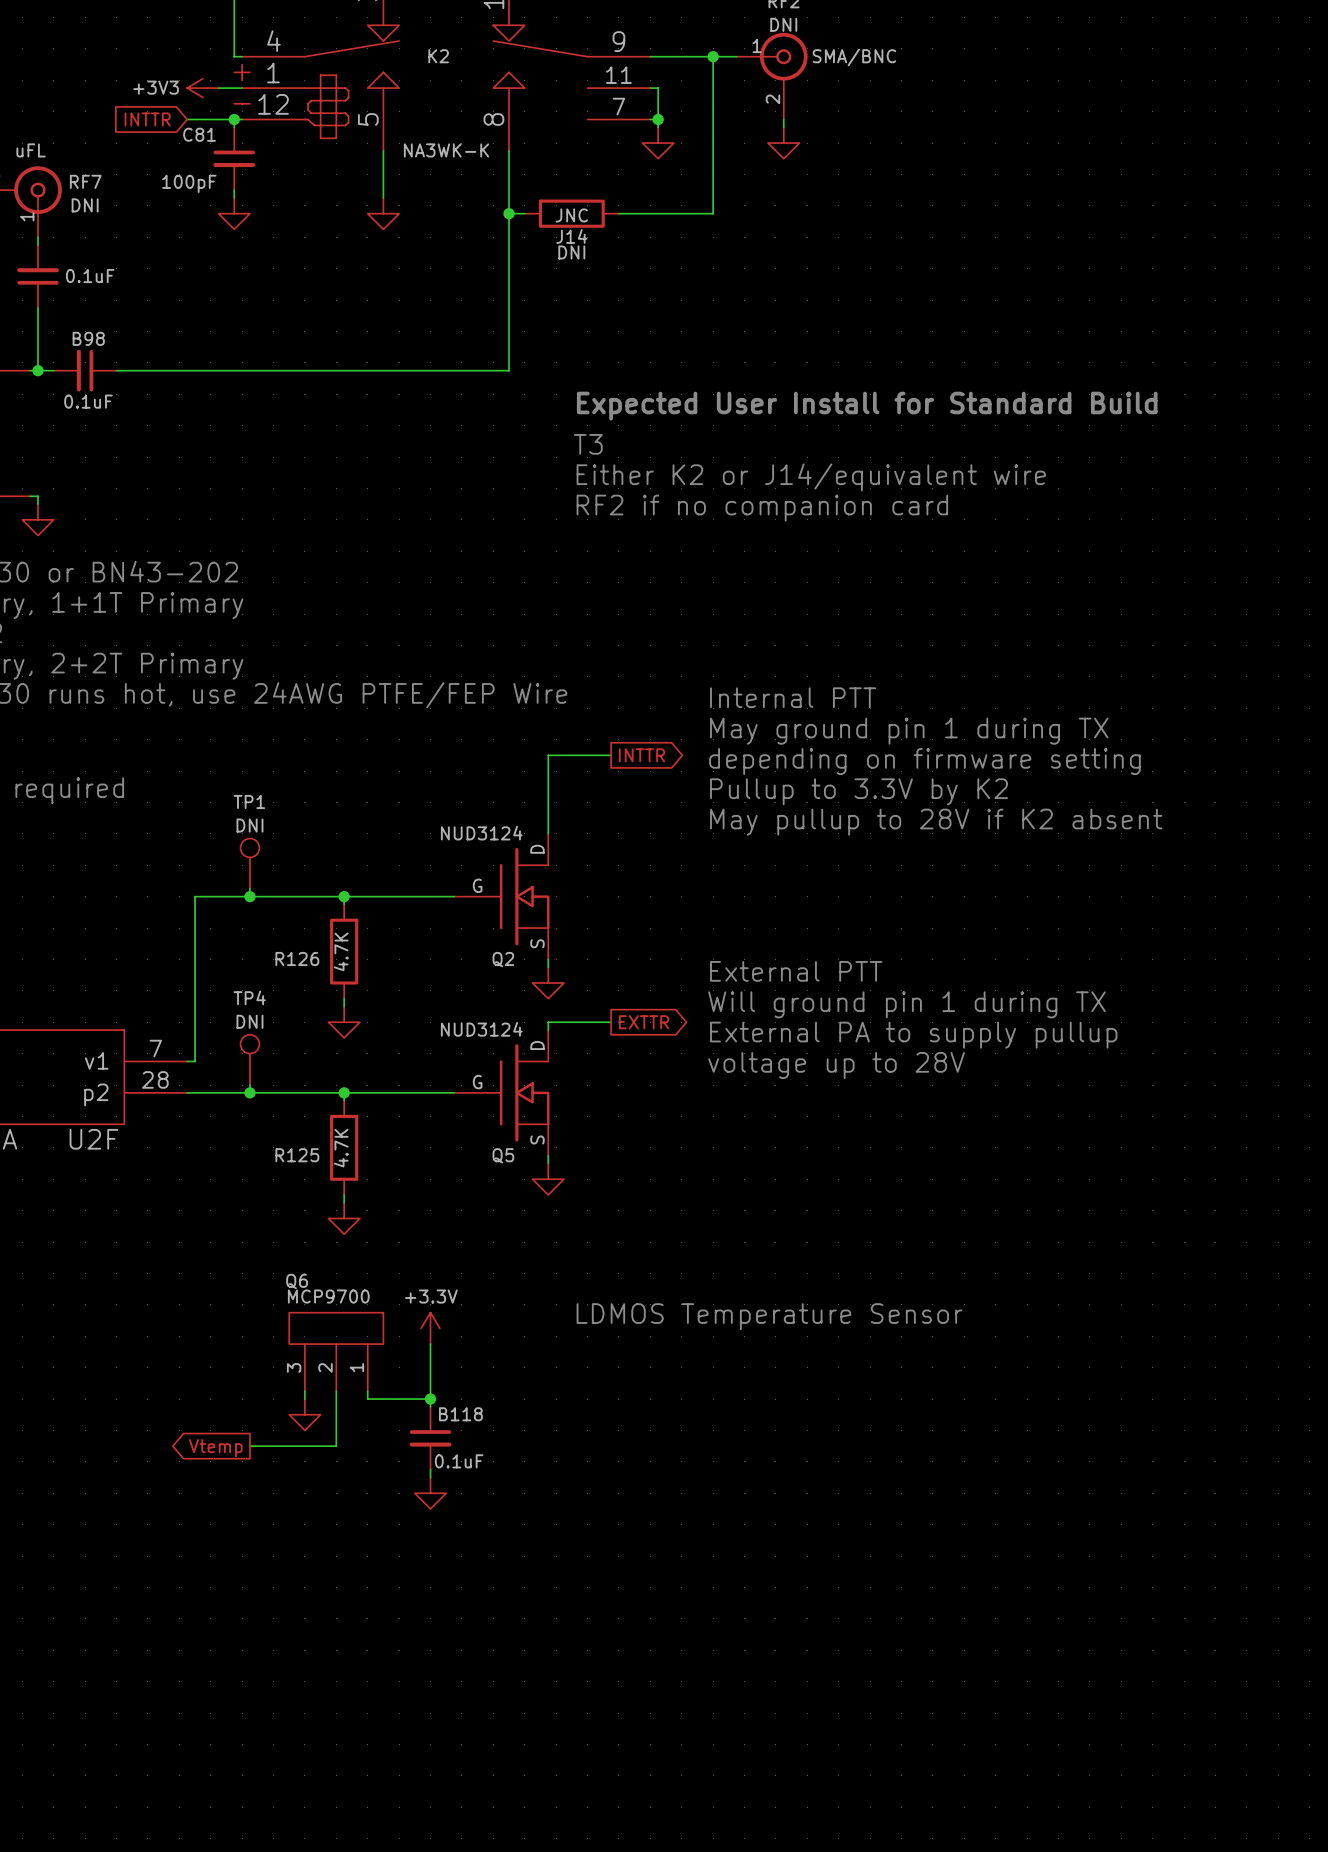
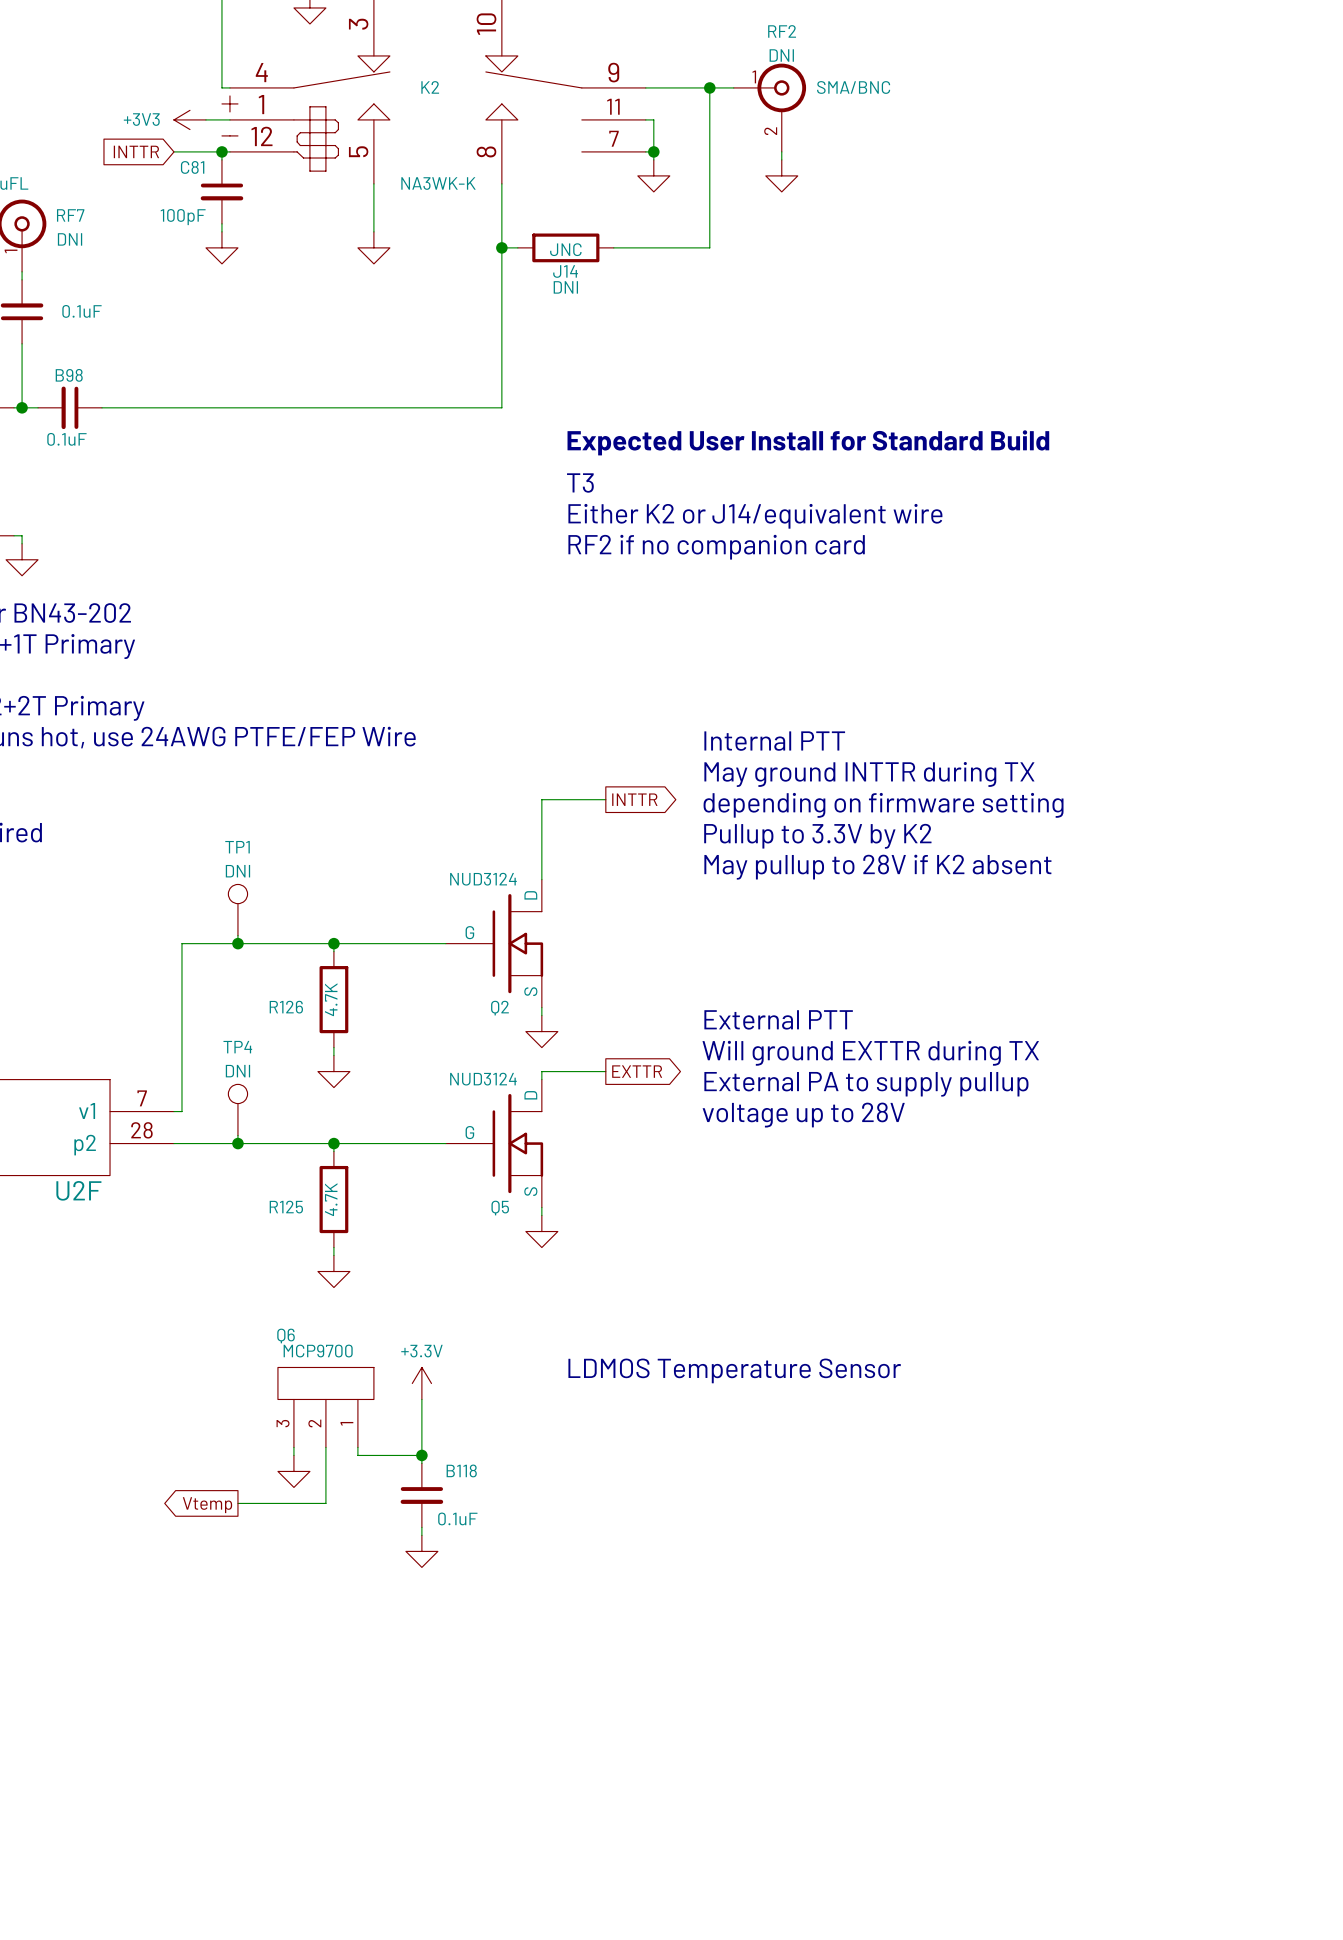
text: May ground pin 1 during TX (909, 731) -> May ground INTTR during TX (869, 774)
text: Will ground pin 1 during TX (907, 1004) -> Will ground EXTTR during TX (870, 1053)

